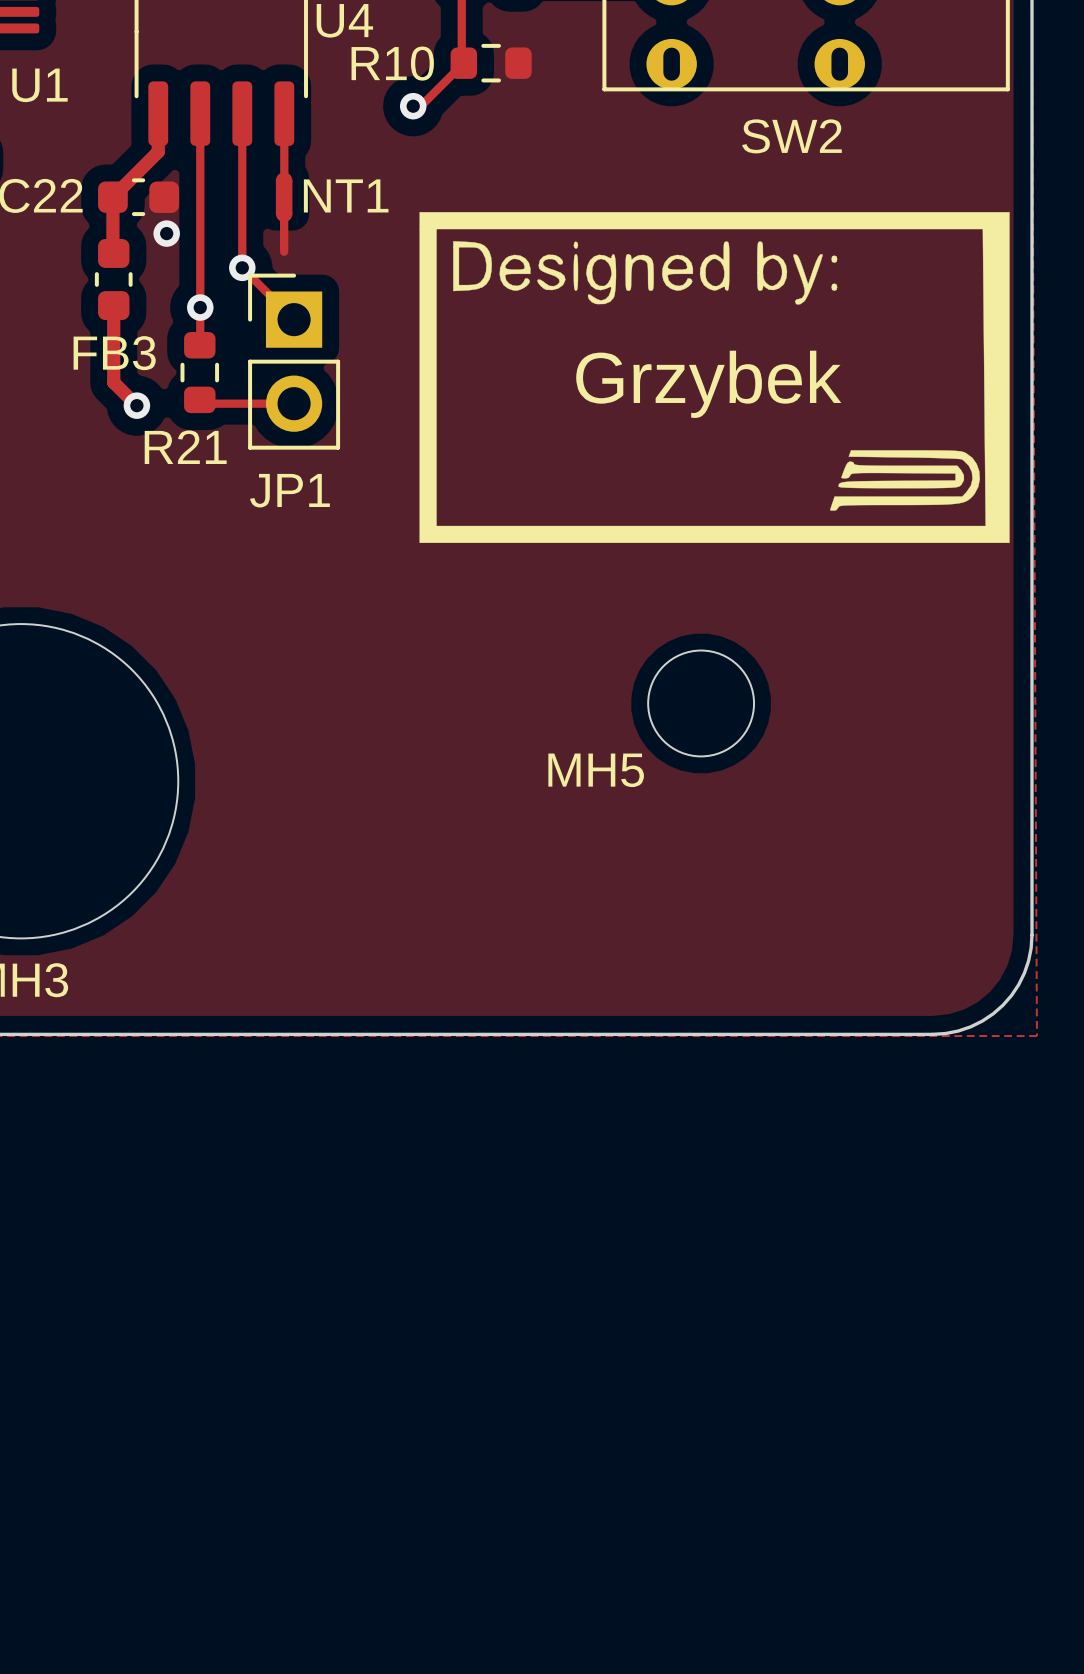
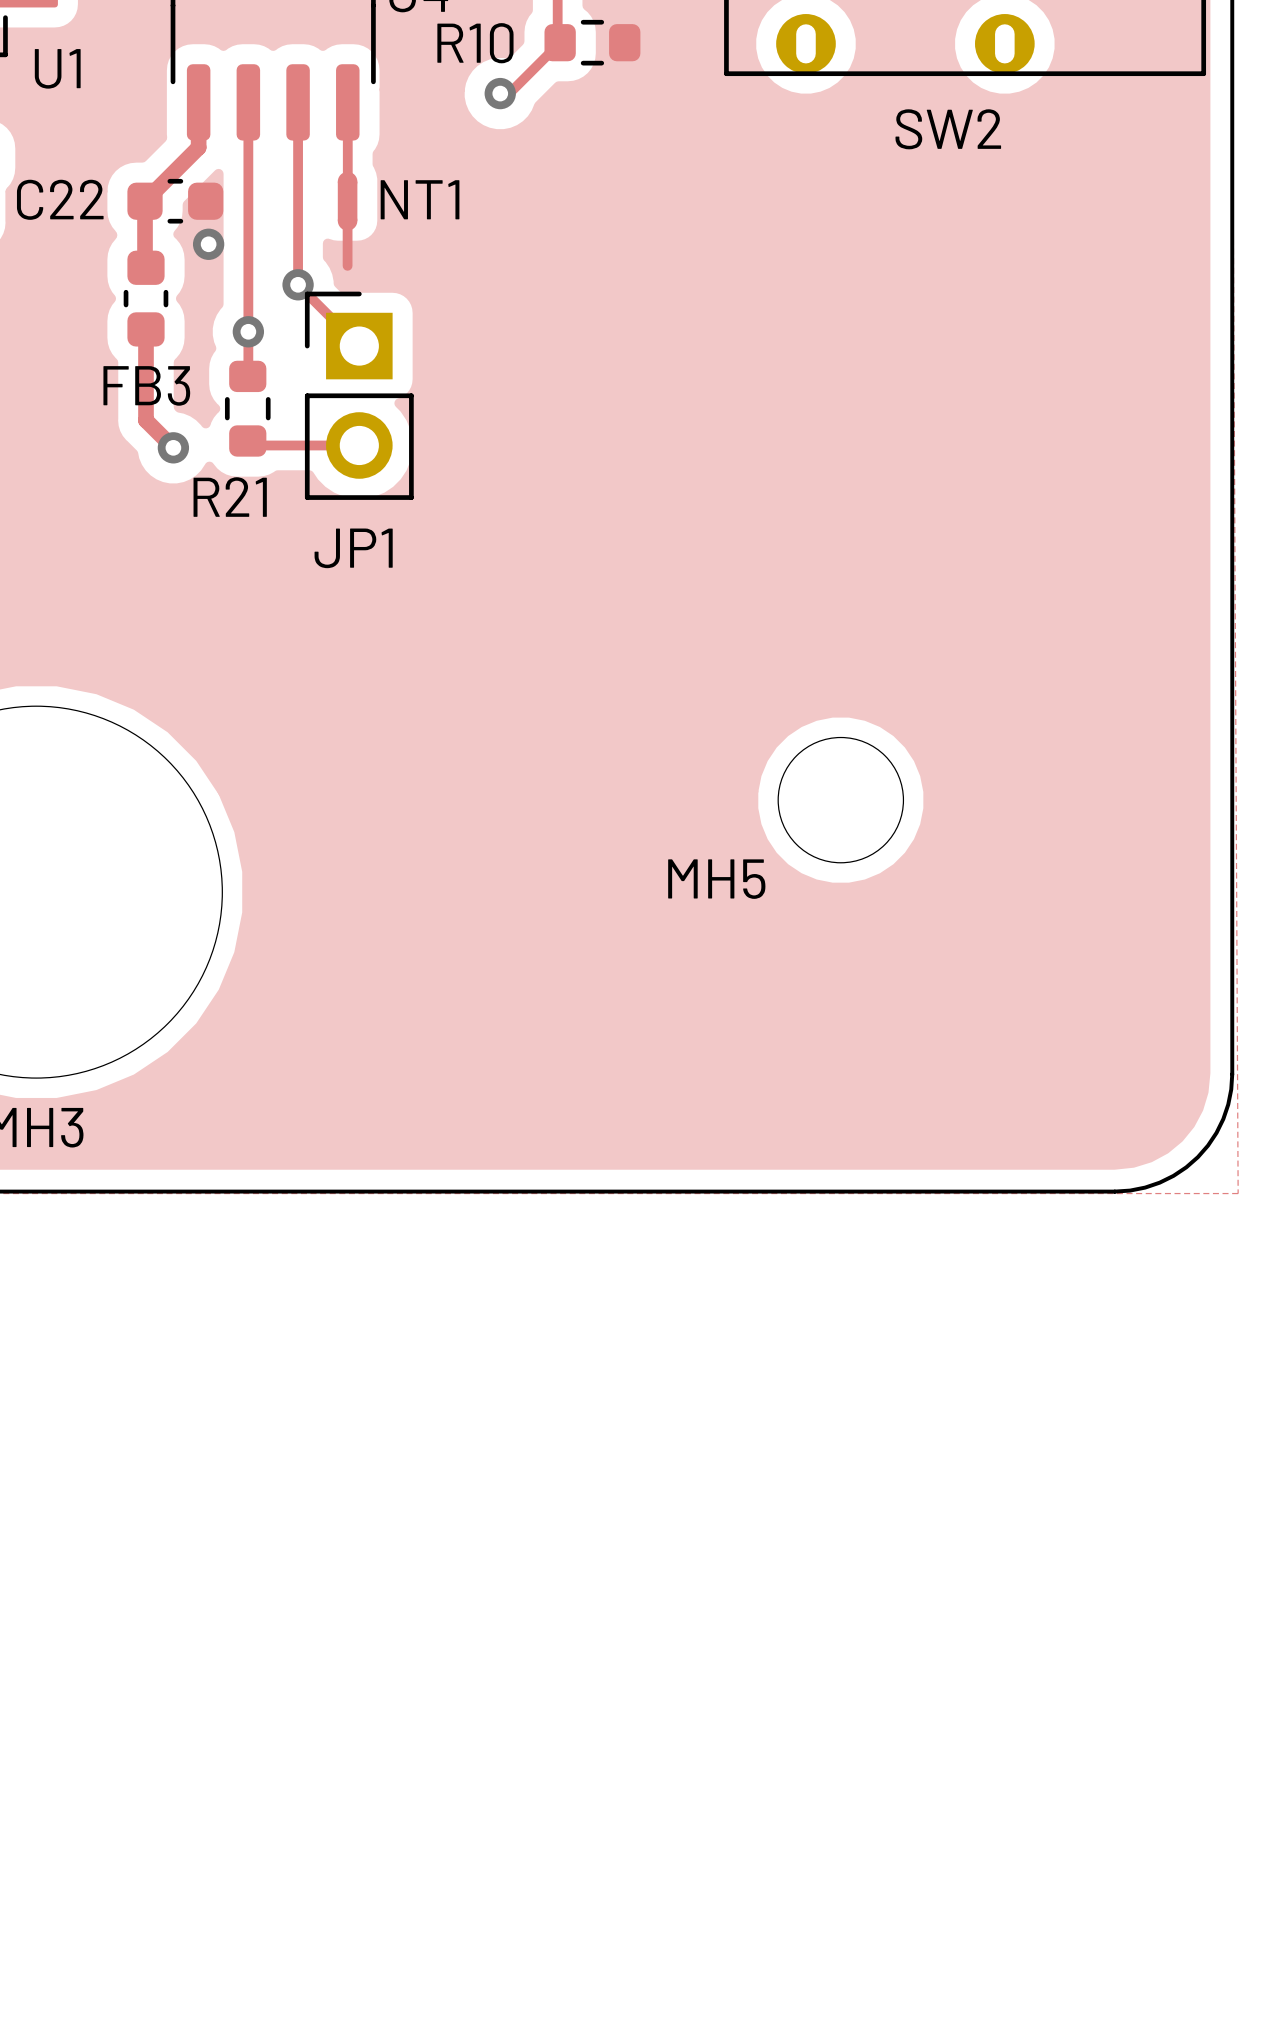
drawing: [419, 212, 1010, 543] -> none
text: Grzybek (708, 384) -> none

